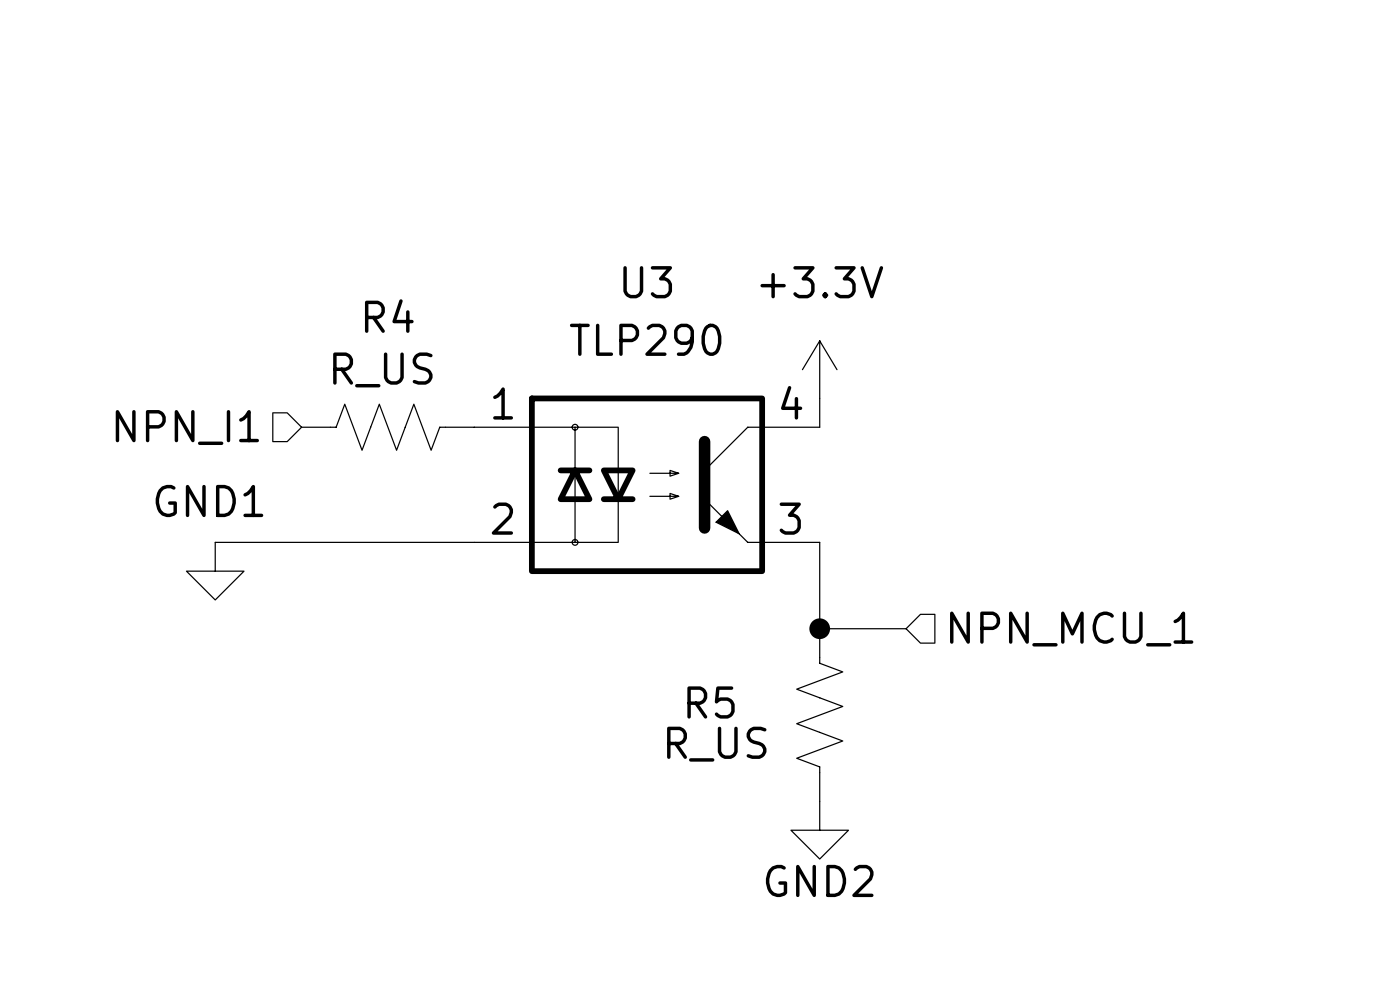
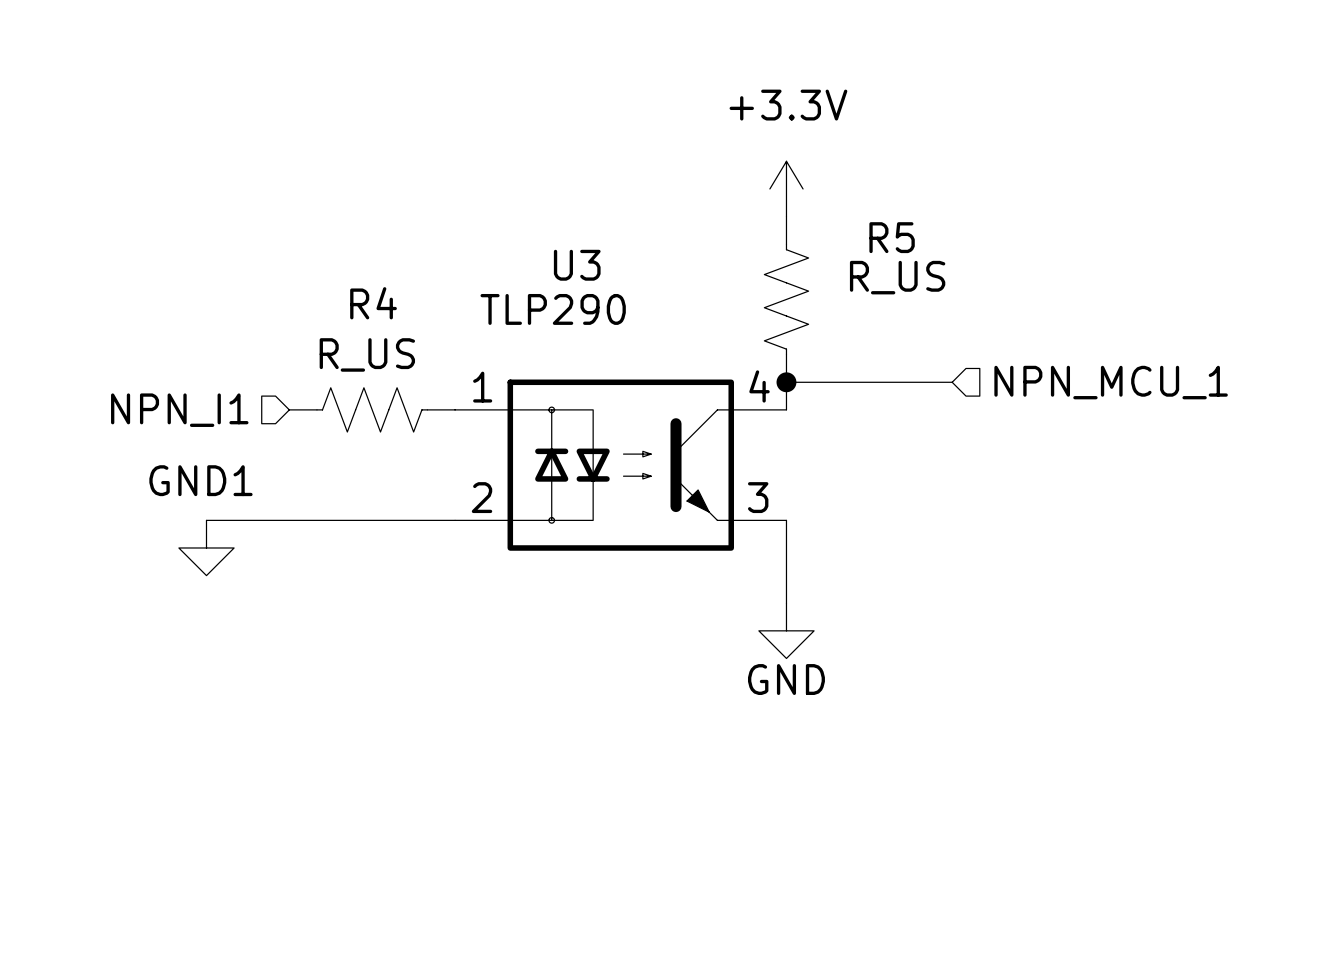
U3 name position: U3 (647, 282) -> U3 (577, 265)
U3 value position: TLP290 (645, 339) -> TLP290 (553, 309)
power symbol position: +3.3V (819, 369) -> +3.3V (786, 188)
wire: none -> (786, 382) (952, 382)
junction: none -> (786, 382)
wire: (819, 628) (906, 628) -> none
junction: (819, 628) -> none
hierarchical label position: NPN_MCU_1 (1071, 629) -> NPN_MCU_1 (1111, 382)
power symbol: none -> GND (786, 630)
R5 name position: R5 (711, 702) -> R5 (892, 237)
R5 position: (819, 715) -> (786, 299)
R5 value position: R_US (716, 744) -> R_US (897, 277)
power symbol: GND2 (819, 830) -> none

